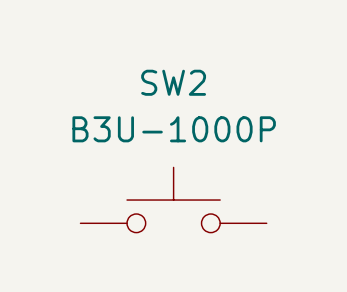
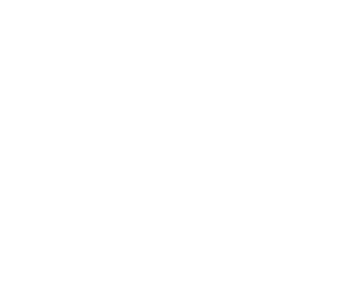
SW2: B3U-1000P (173, 200) -> none

